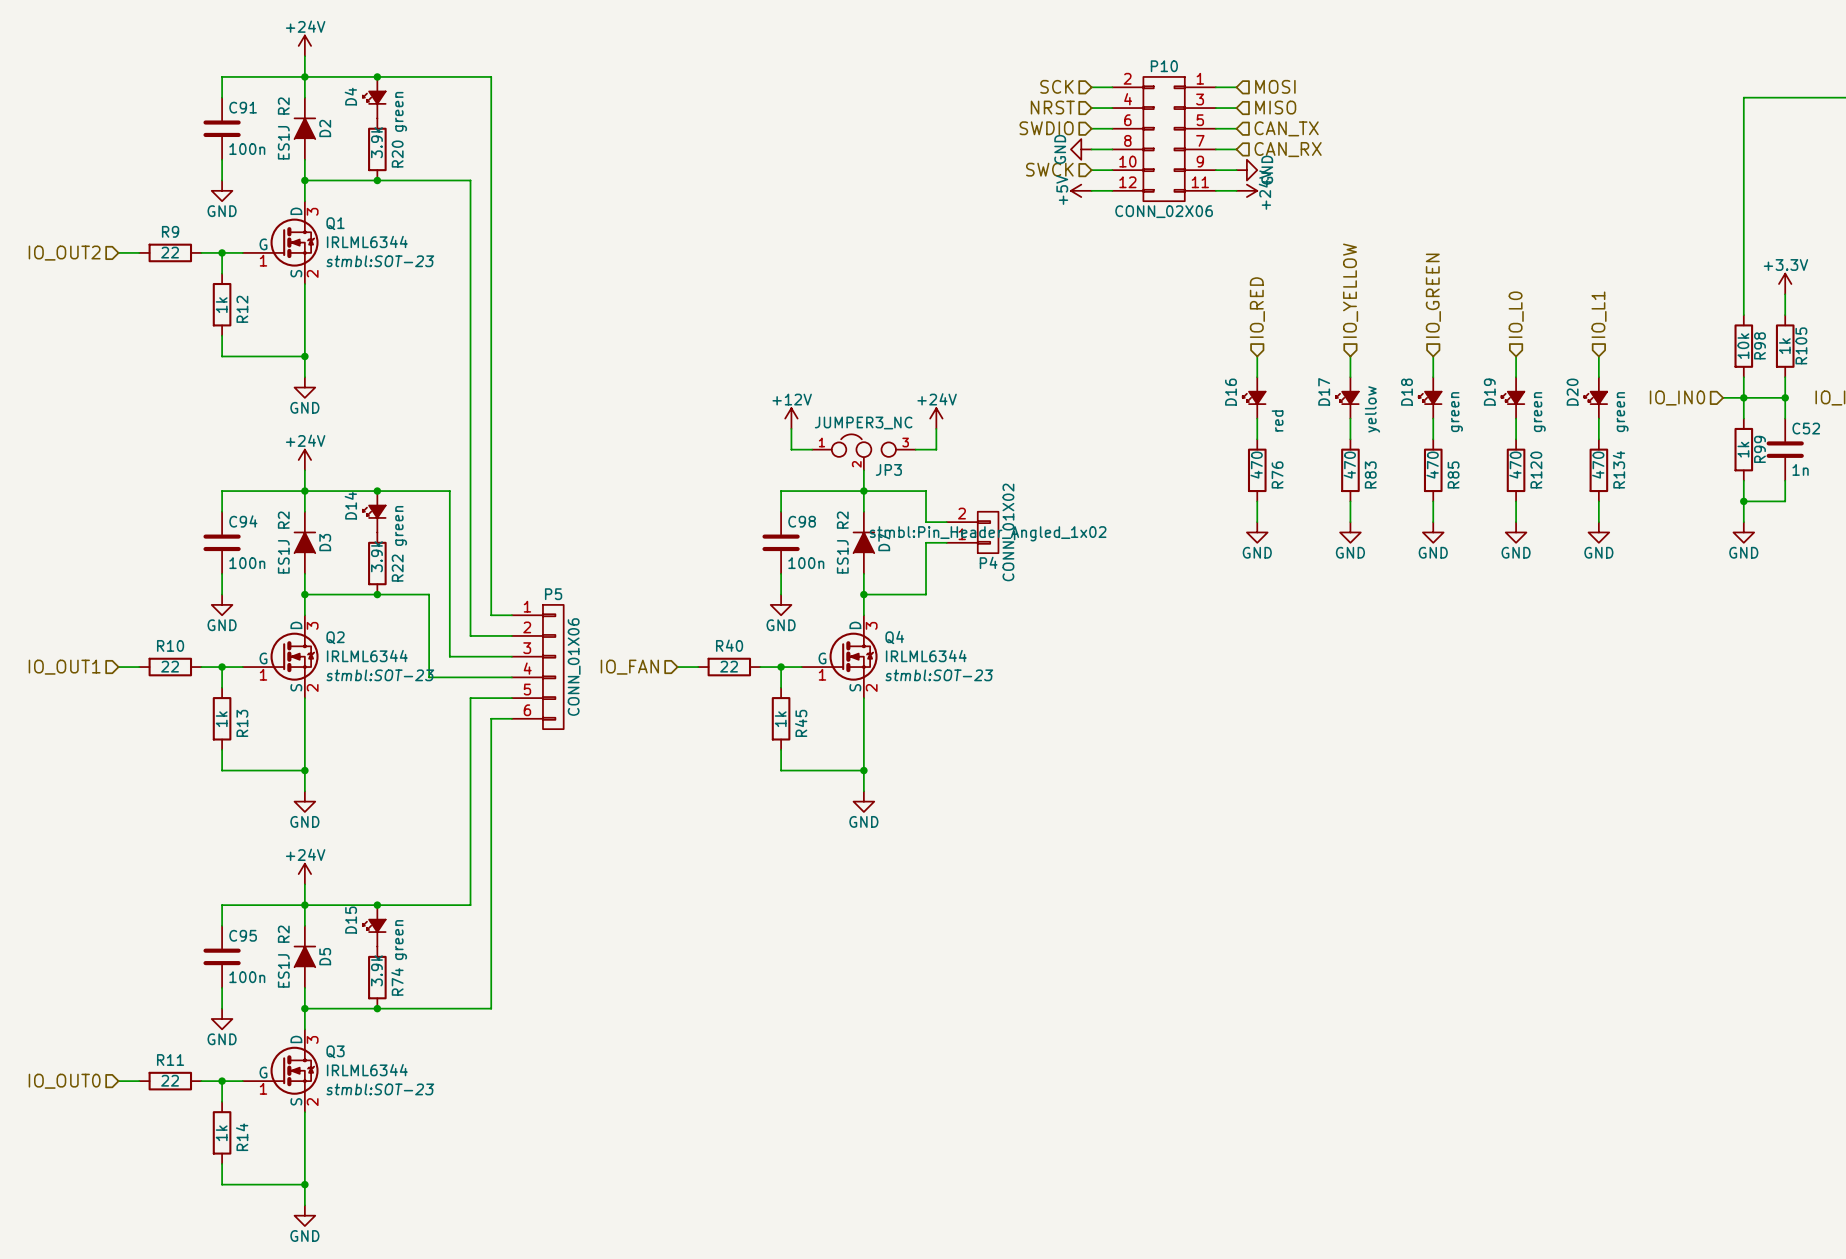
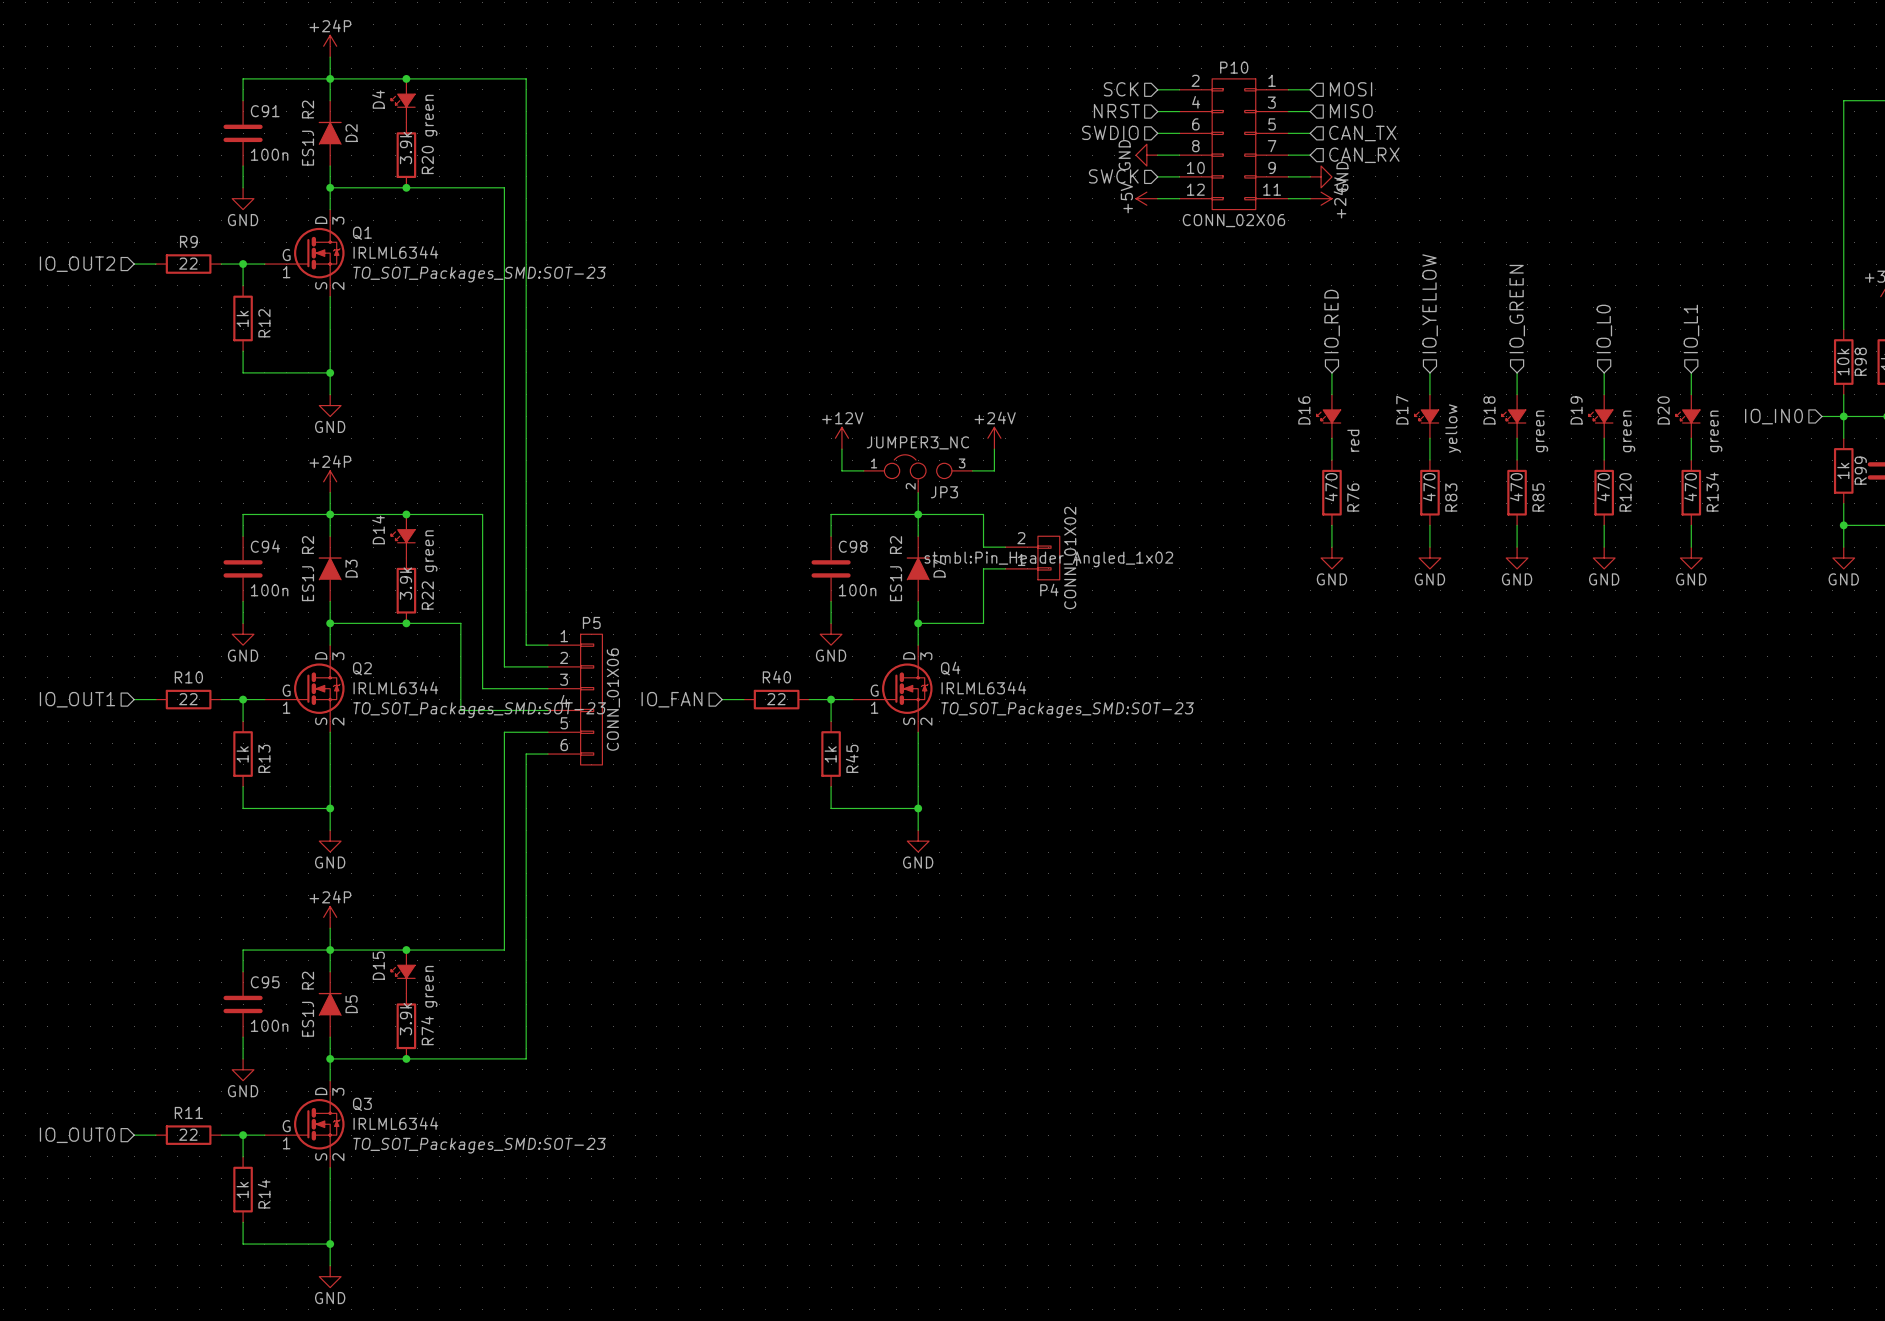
power symbol: +24V (304, 45) -> +24P (330, 46)
Q1 text: stmbl:SOT-23 (380, 261) -> TO_SOT_Packages_SMD:SOT-23 (479, 274)
power symbol: +24V (304, 459) -> +24P (330, 481)
Q2 text: stmbl:SOT-23 (380, 675) -> TO_SOT_Packages_SMD:SOT-23 (479, 710)
Q4 text: stmbl:SOT-23 (939, 675) -> TO_SOT_Packages_SMD:SOT-23 (1067, 710)
power symbol: +24V (304, 874) -> +24P (330, 917)
Q3 text: stmbl:SOT-23 (380, 1089) -> TO_SOT_Packages_SMD:SOT-23 (479, 1145)

